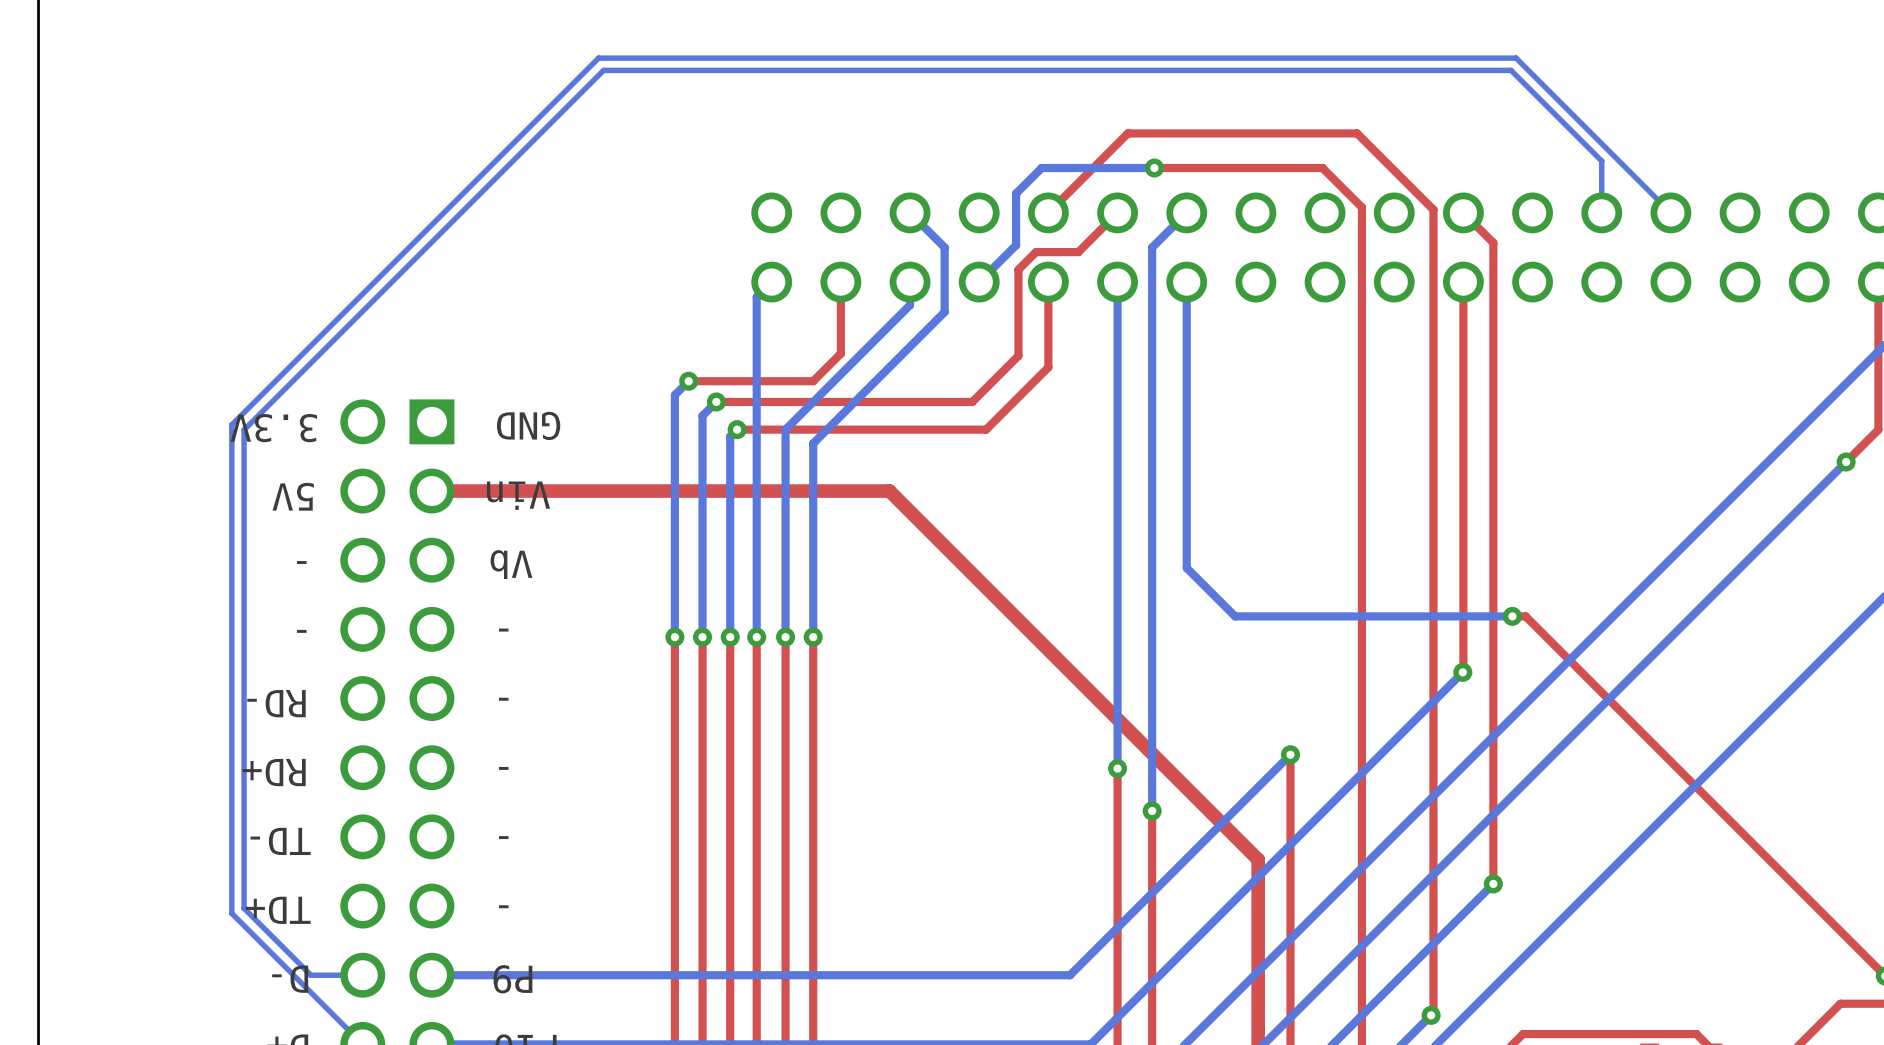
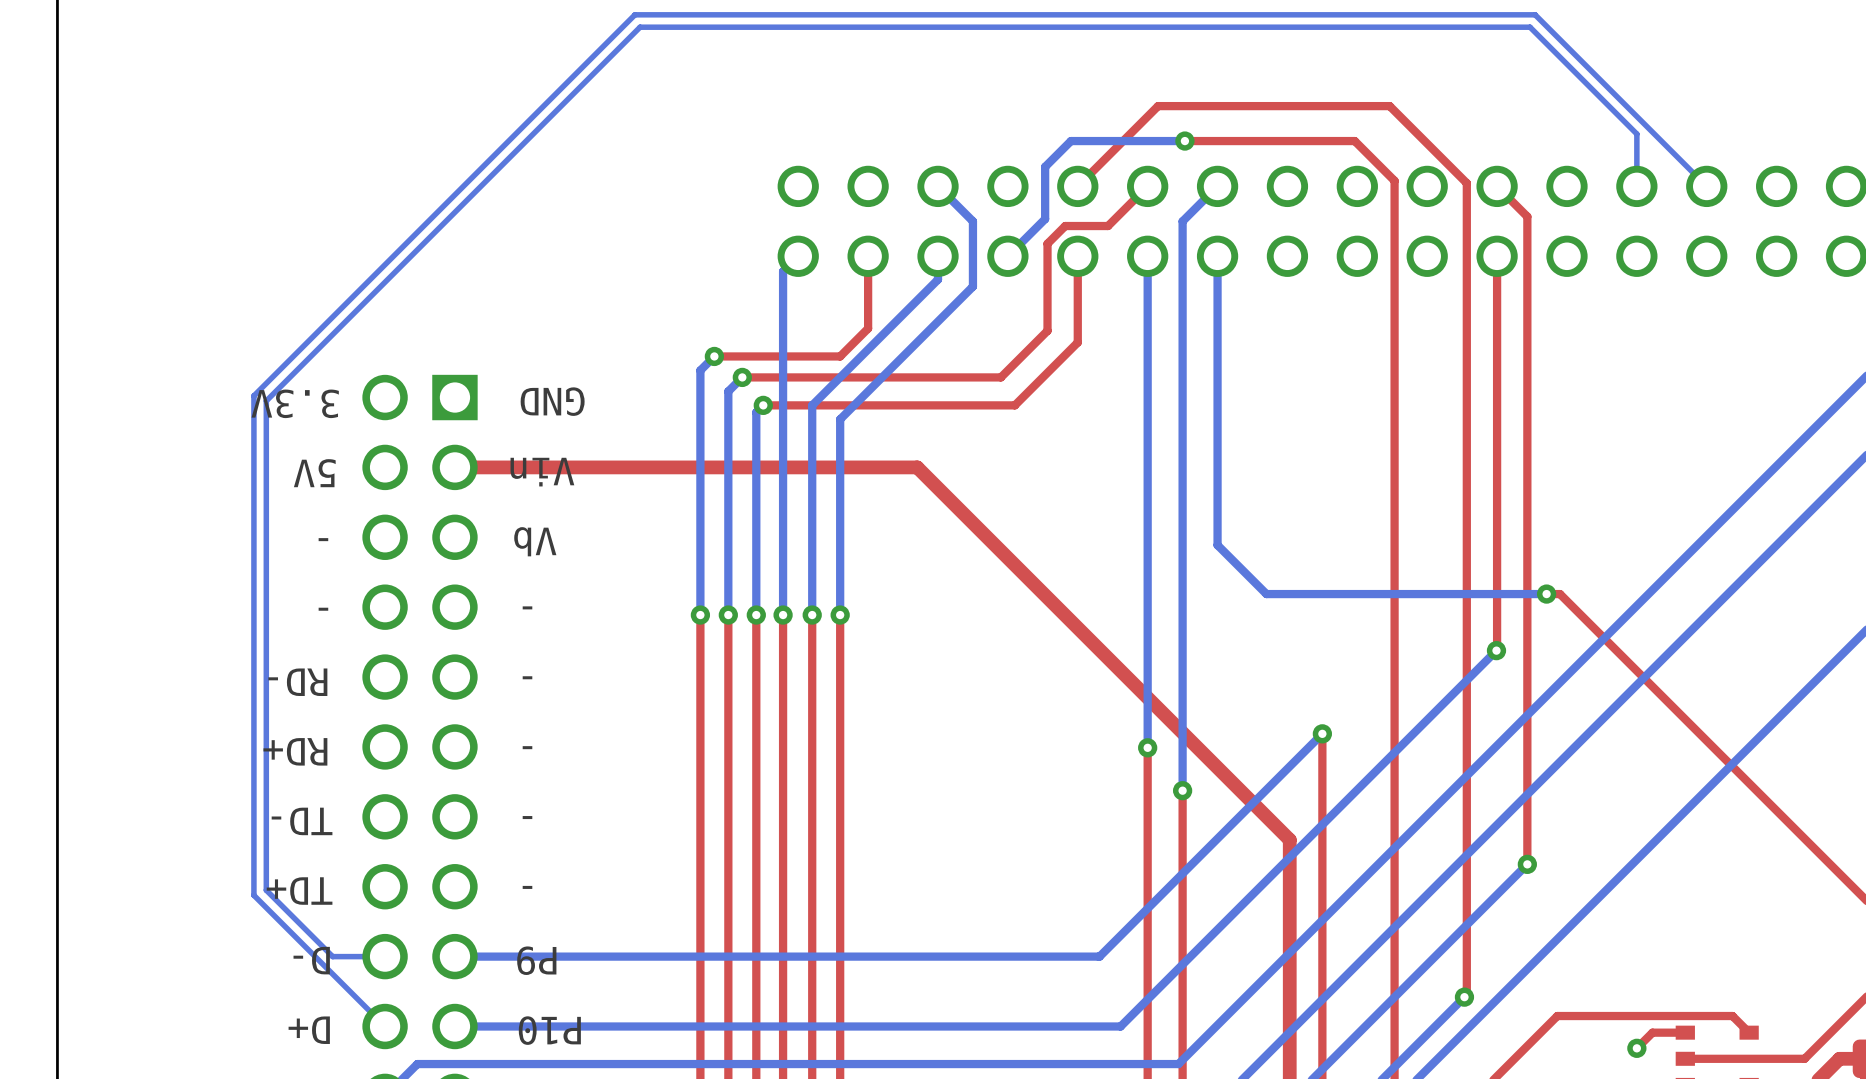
bottom track: (1516, 58) (598, 58) (231, 424) (232, 914) -> (1550, 30) (1535, 14) (634, 14) (253, 395) (253, 895)
bottom track: (1511, 70) (603, 70) (244, 429) (245, 909) -> (1545, 42) (1530, 27) (640, 27) (266, 400) (266, 890)

